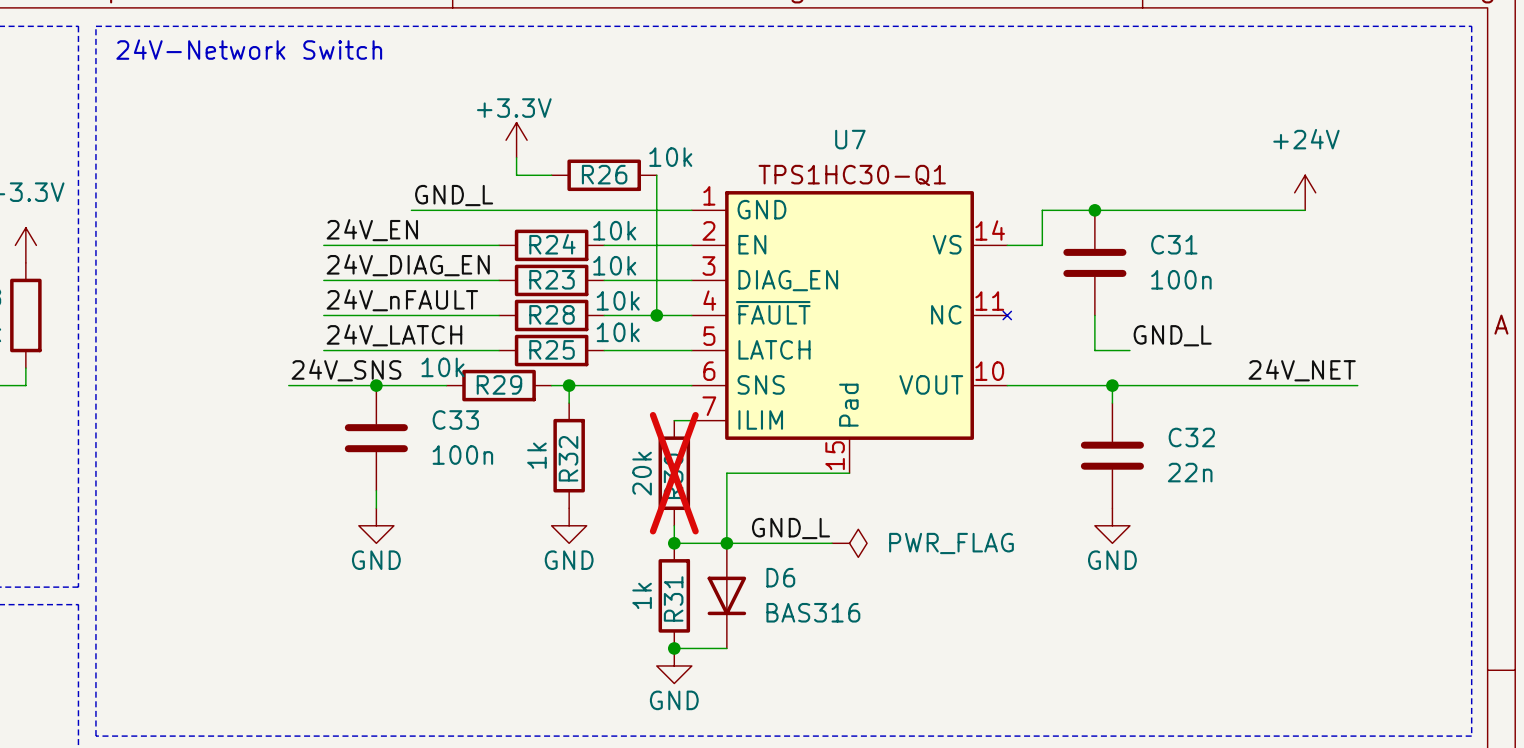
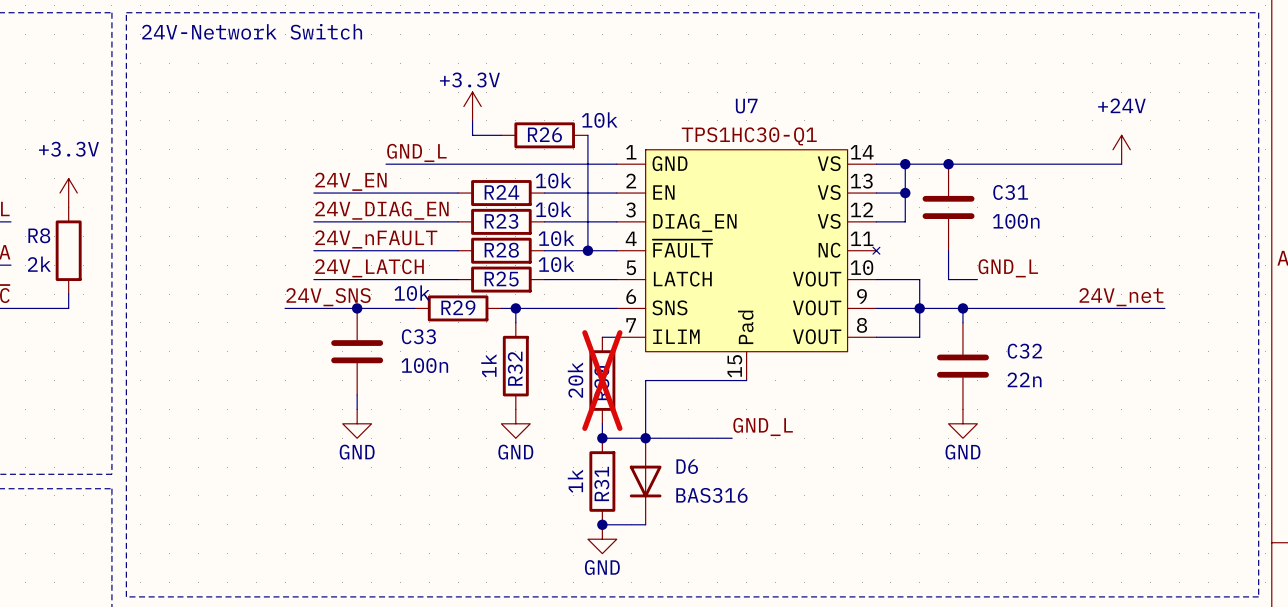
U7 symbol: [691, 191, 1012, 474] -> [616, 149, 880, 381]
wire: none -> (876, 164) (905, 164)
junction: none -> (905, 164)
wire: none -> (905, 193) (905, 221) (876, 221)
junction: none -> (905, 193)
wire: none -> (876, 279) (919, 279) (919, 337) (876, 337)
label: 24V_NET (1302, 370) -> 24V_net (1121, 297)
junction: none -> (919, 308)
label position: GND_L (791, 528) -> GND_L (763, 426)
power symbol: PWR_FLAG (849, 543) -> none

